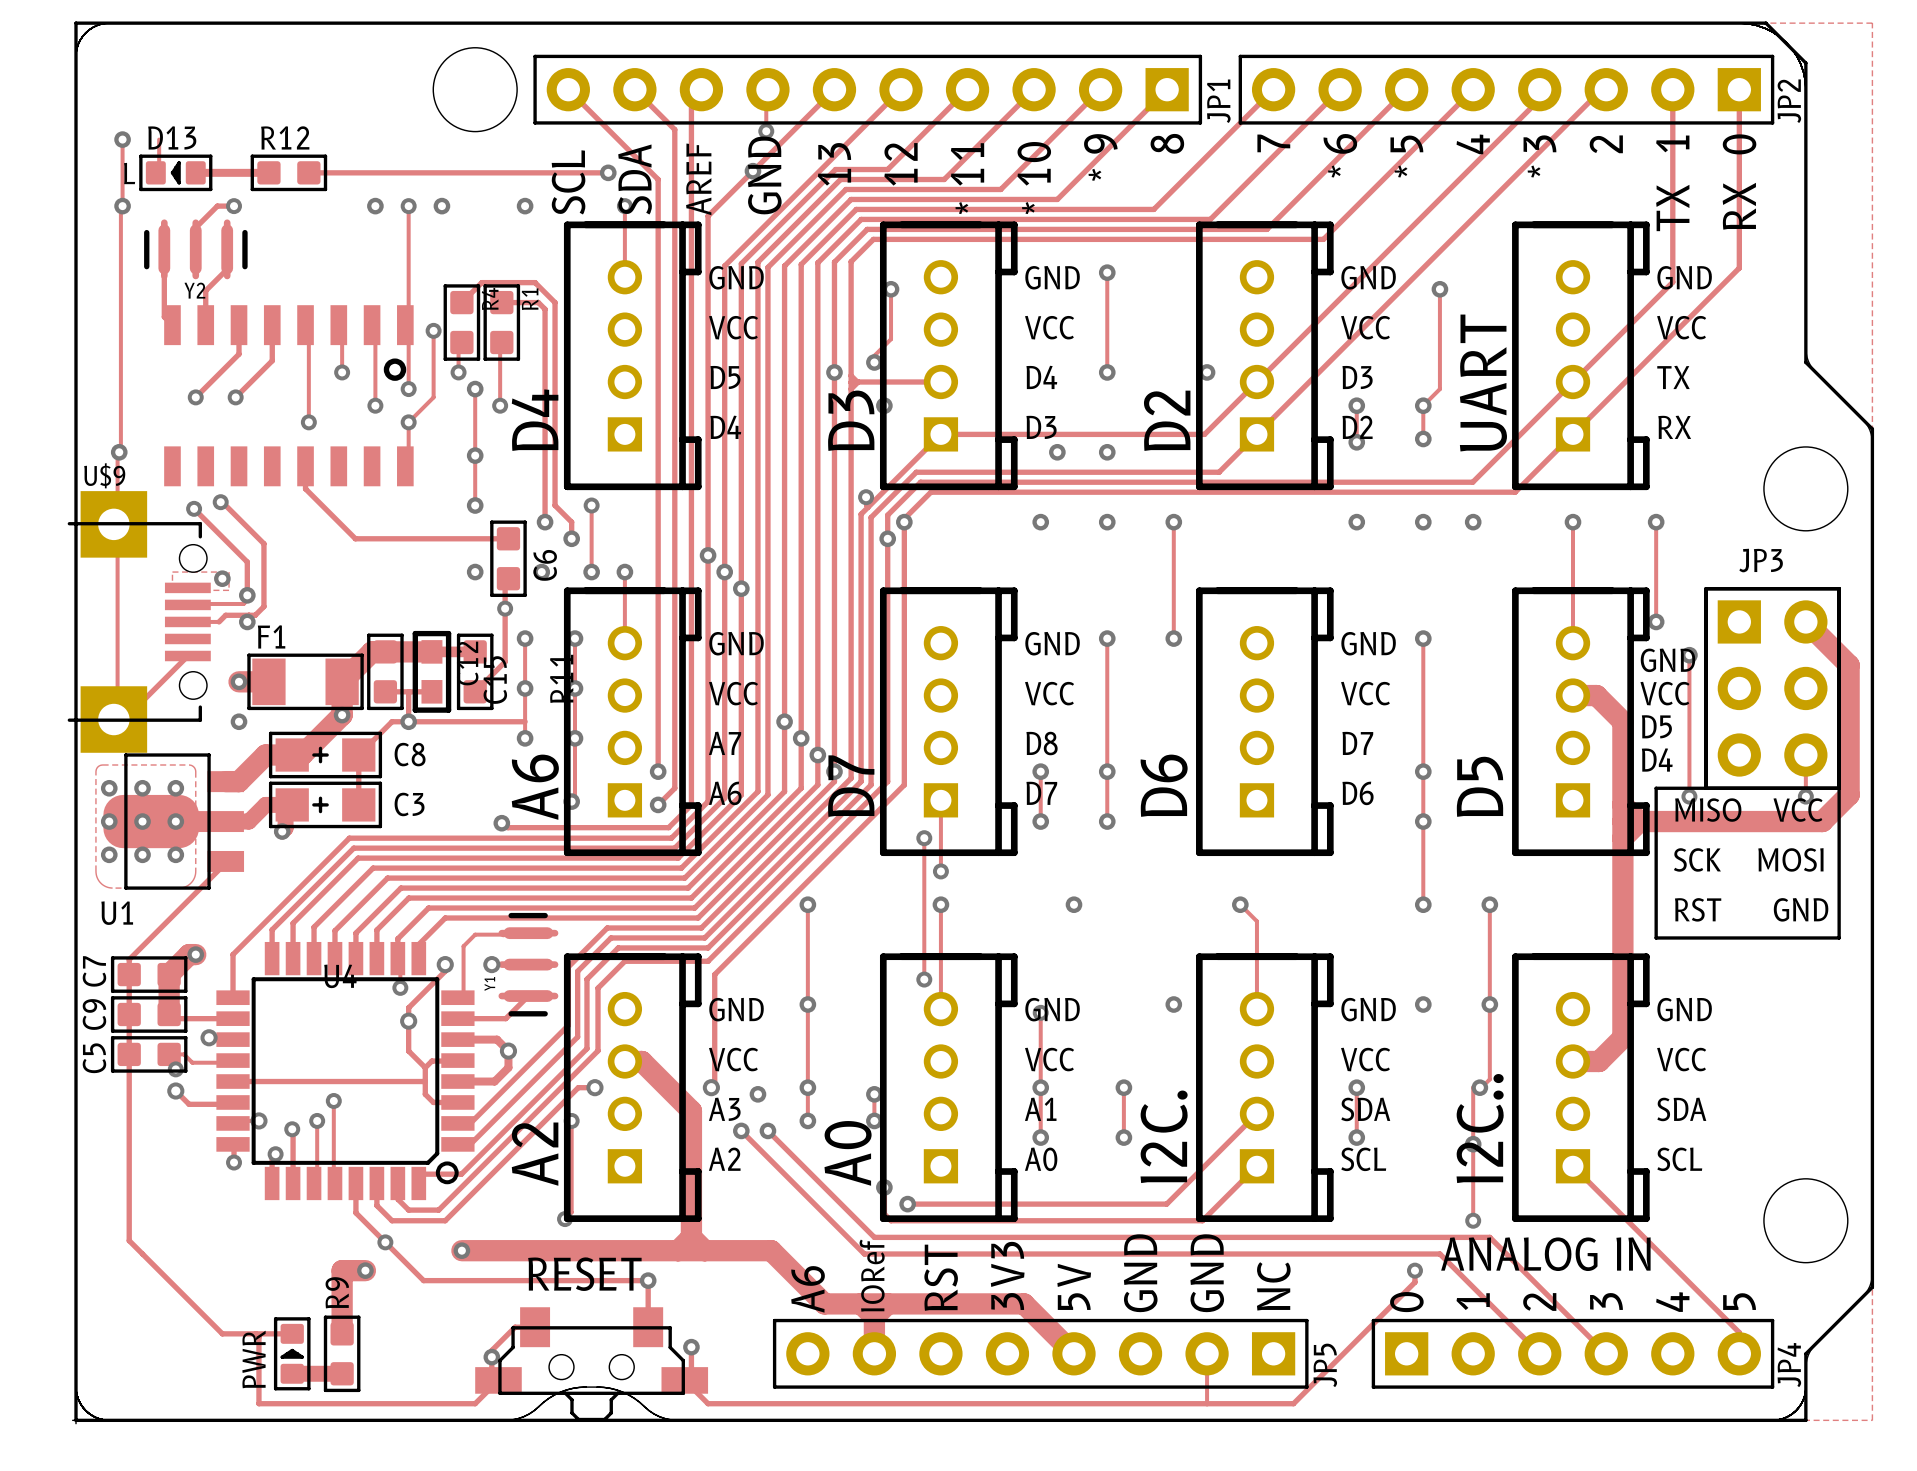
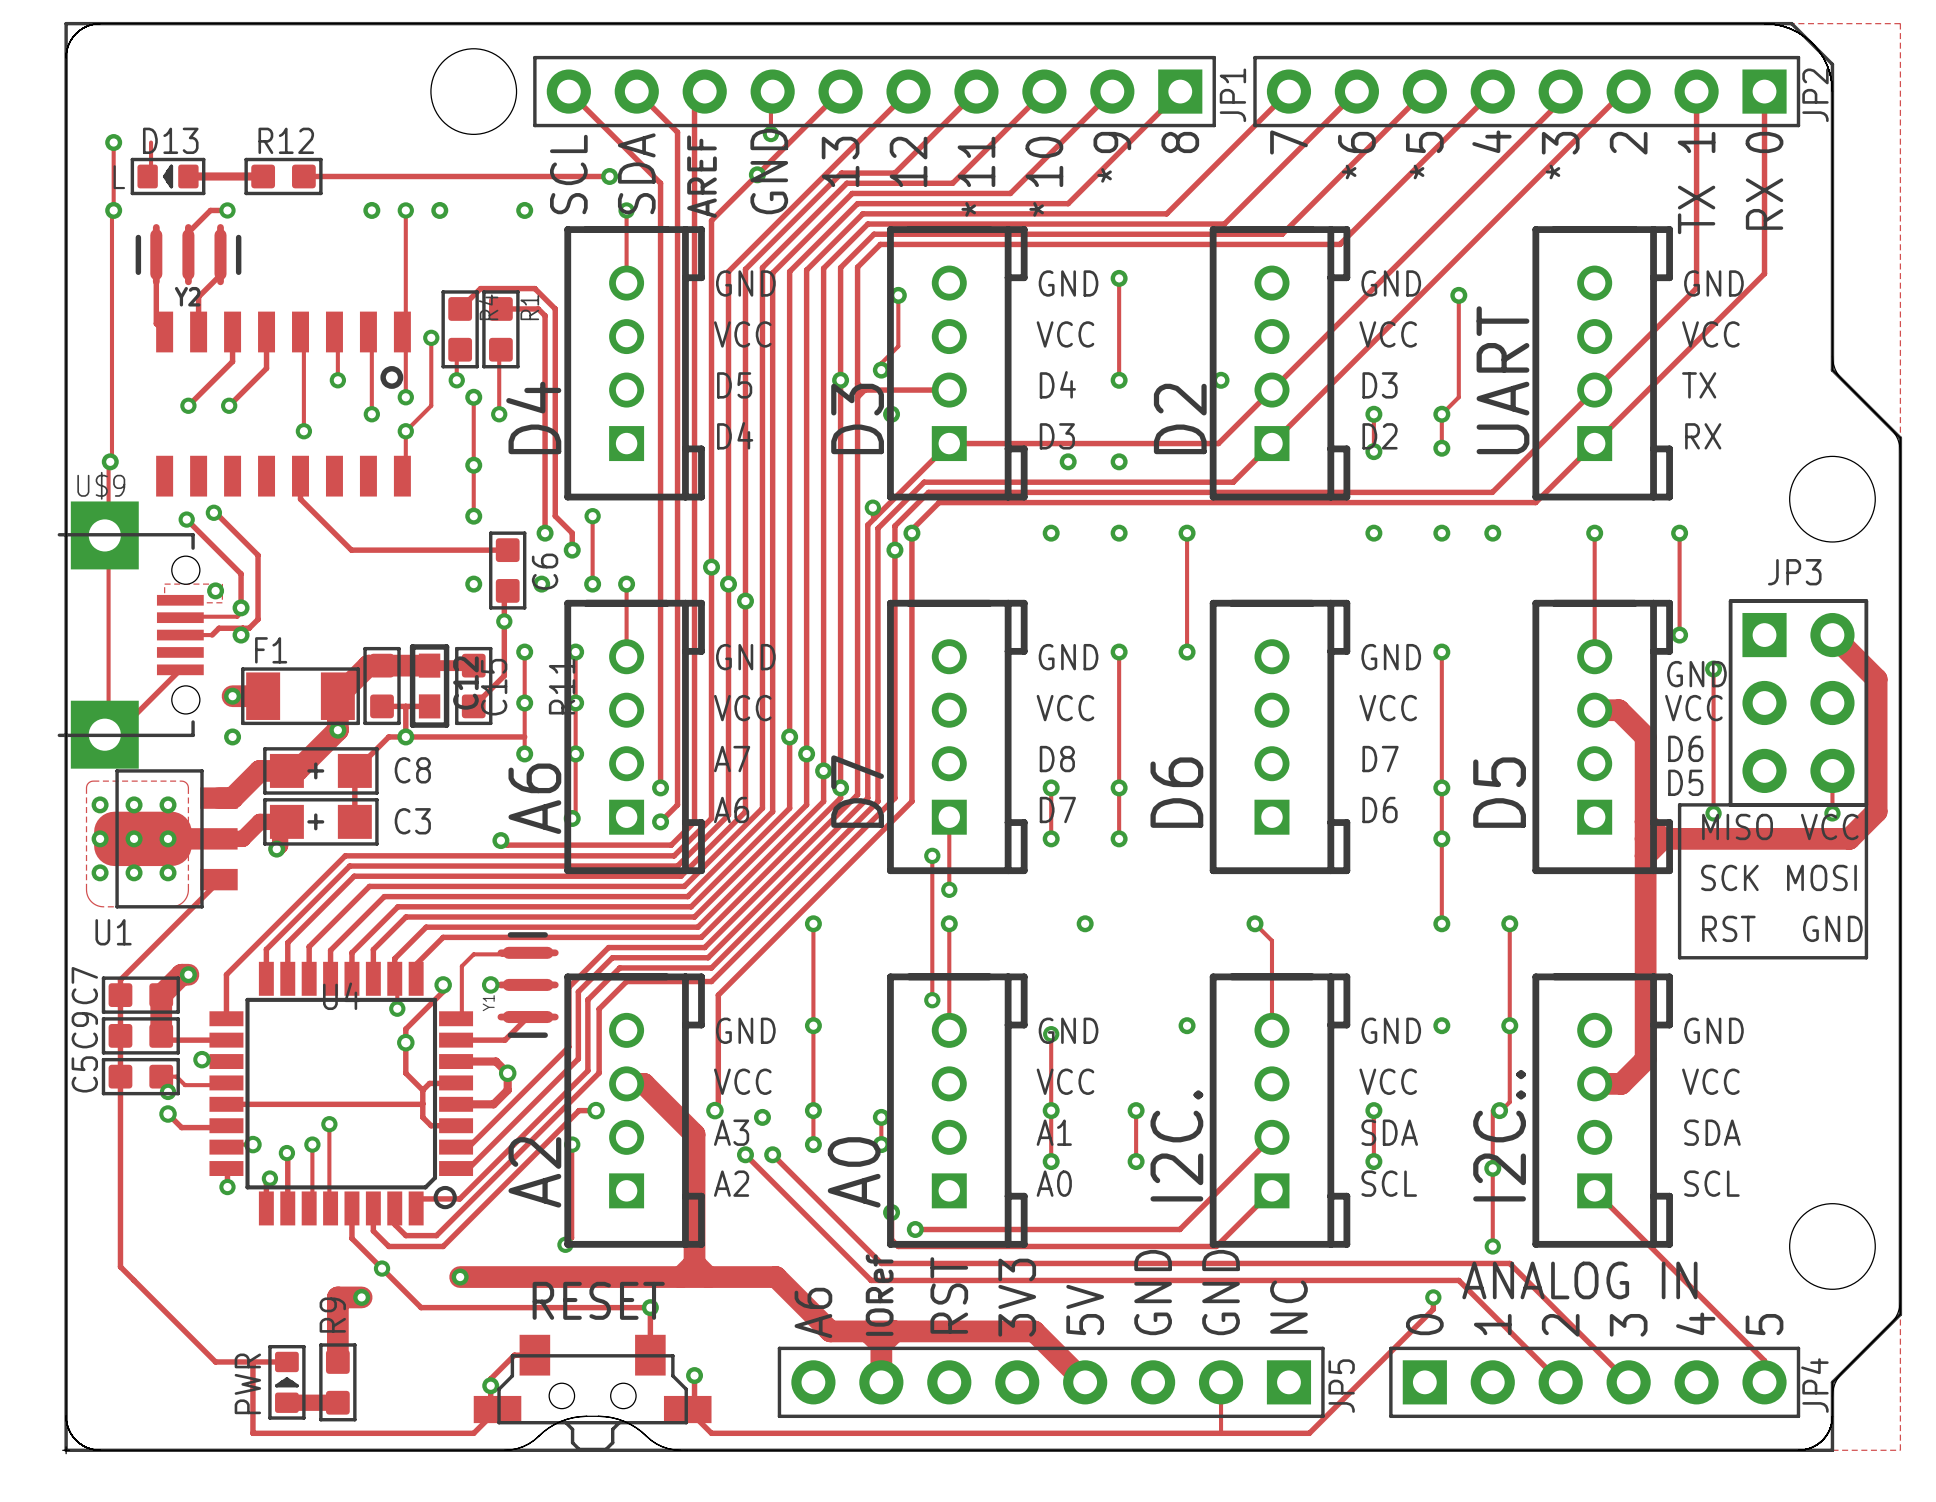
text position: D5 (1656, 726) -> D5 (1685, 782)
text: none -> D6 (1685, 748)
text: D4 (1657, 760) -> none

